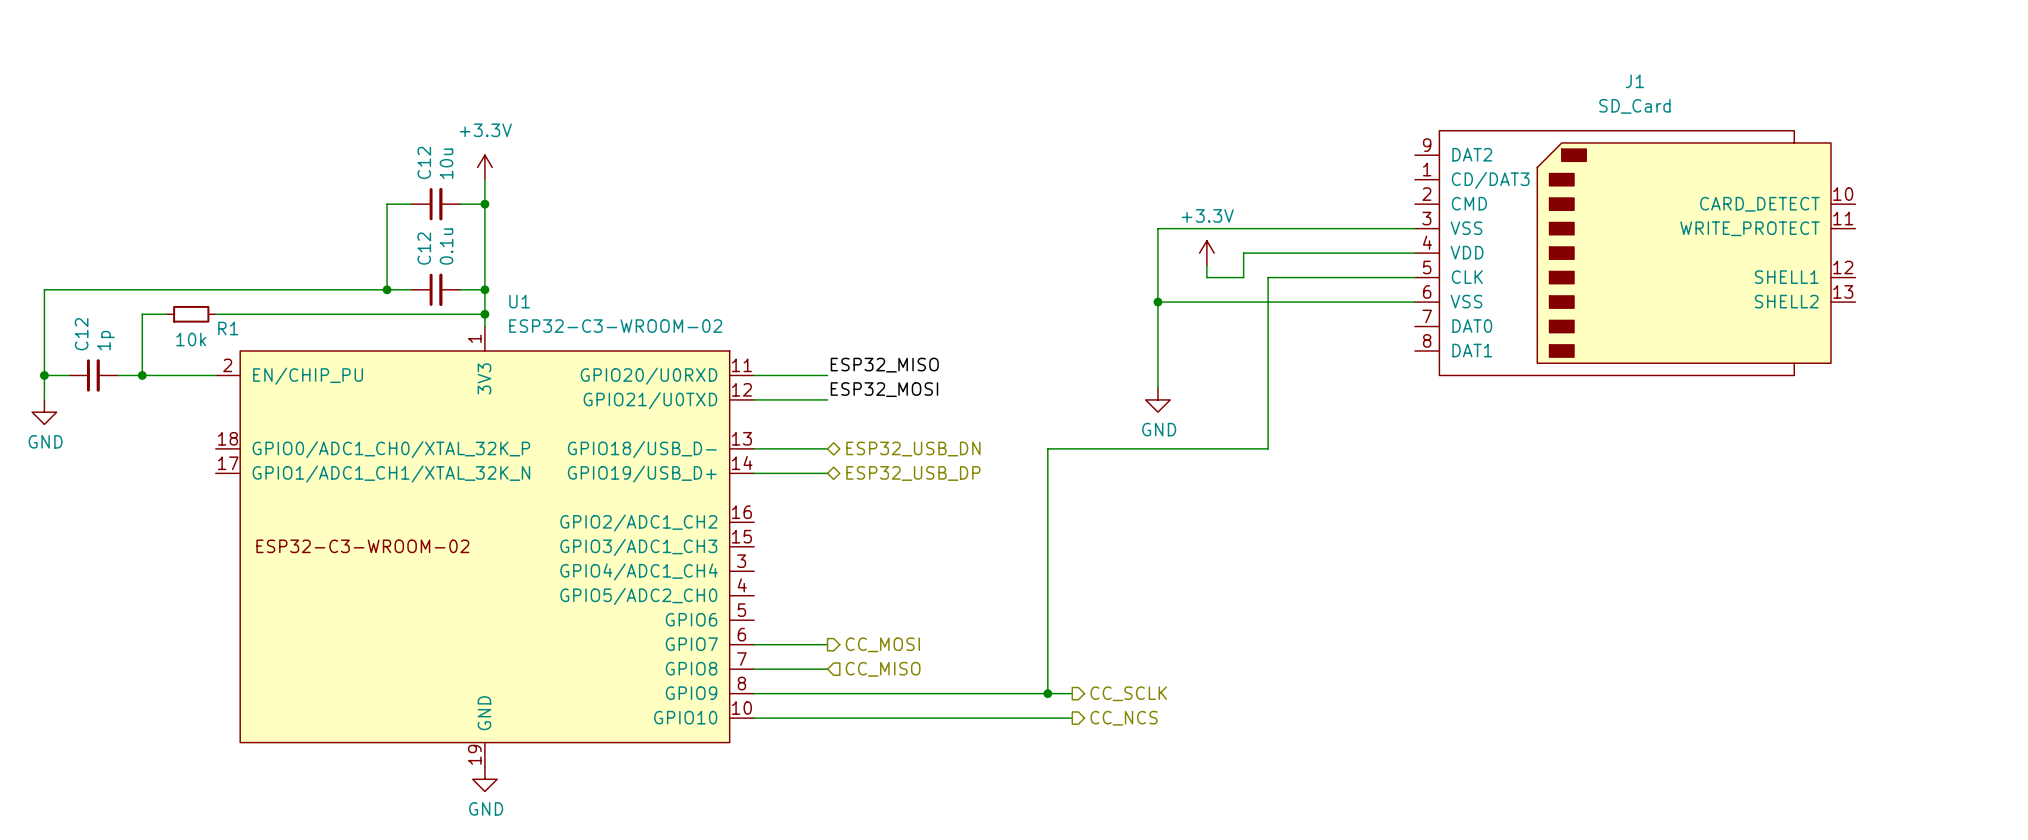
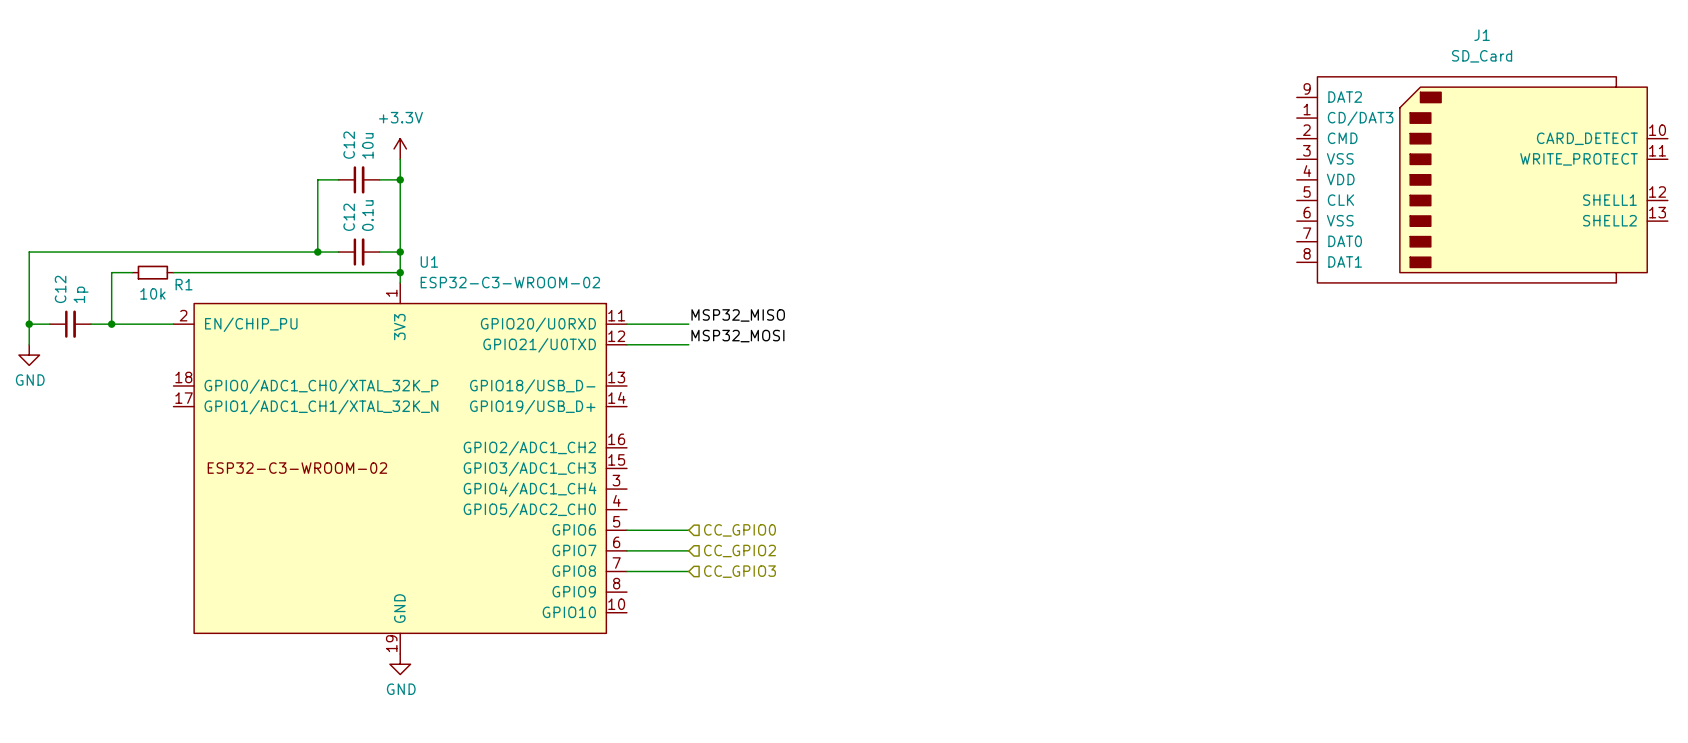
wire: (1414, 228) (1157, 228) (1157, 387) -> none
power symbol: +3.3V (1206, 253) -> none
wire: (1414, 253) (1243, 253) (1243, 277) (1206, 277) (1206, 265) -> none
J1 position: (1635, 253) -> (1482, 179)
wire: (1414, 277) (1268, 277) (1268, 448) (1047, 448) (1047, 693) -> none
wire: (1157, 302) (1414, 302) -> none
junction: (1157, 302) -> none
label: ESP32_MISO (884, 365) -> MSP32_MISO (738, 315)
label: ESP32_MOSI (884, 389) -> MSP32_MOSI (737, 336)
power symbol: GND (1157, 399) -> none
wire: (754, 448) (827, 448) -> none
hierarchical label: ESP32_USB_DN (913, 449) -> none
wire: (754, 473) (827, 473) -> (626, 530) (688, 530)
hierarchical label: ESP32_USB_DP (913, 473) -> none
hierarchical label: none -> CC_GPIO0 (739, 530)
hierarchical label shape: output (882, 644) -> input (739, 550)
hierarchical label: CC_MOSI (882, 644) -> CC_GPIO2 (739, 550)
hierarchical label: CC_MISO (883, 669) -> CC_GPIO3 (739, 571)
wire: (754, 693) (1072, 693) -> none
junction: (1047, 693) -> none
hierarchical label: CC_SCLK (1128, 693) -> none
wire: (754, 718) (1072, 718) -> none
hierarchical label: CC_NCS (1124, 718) -> none

